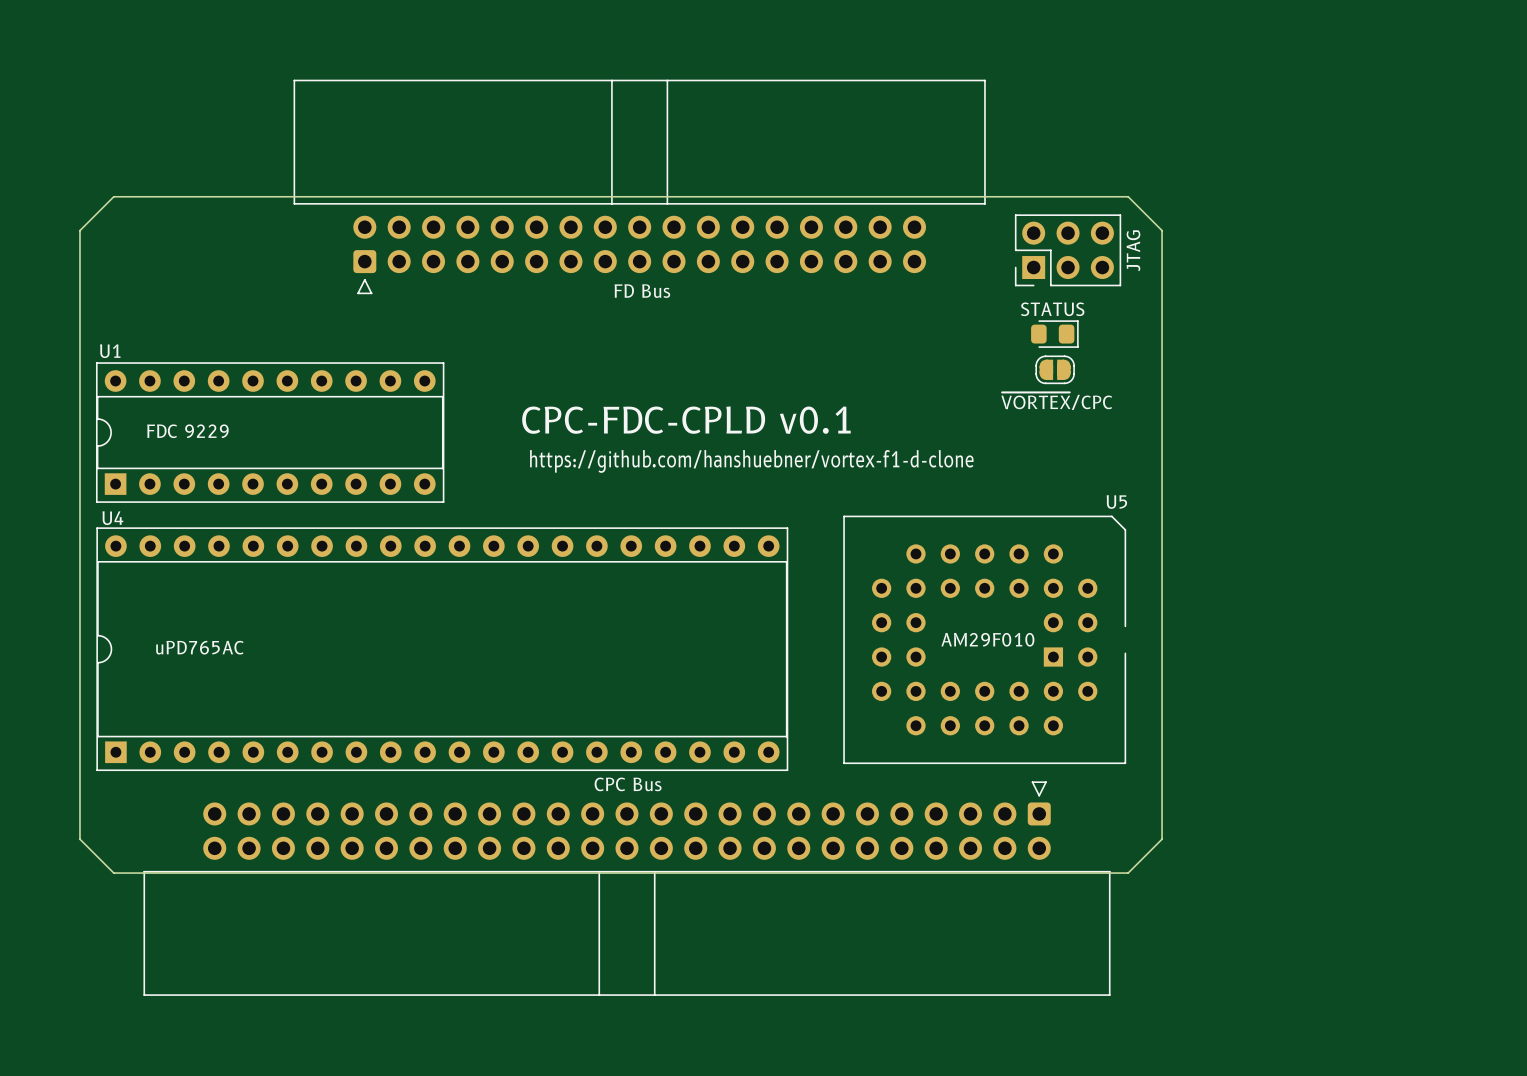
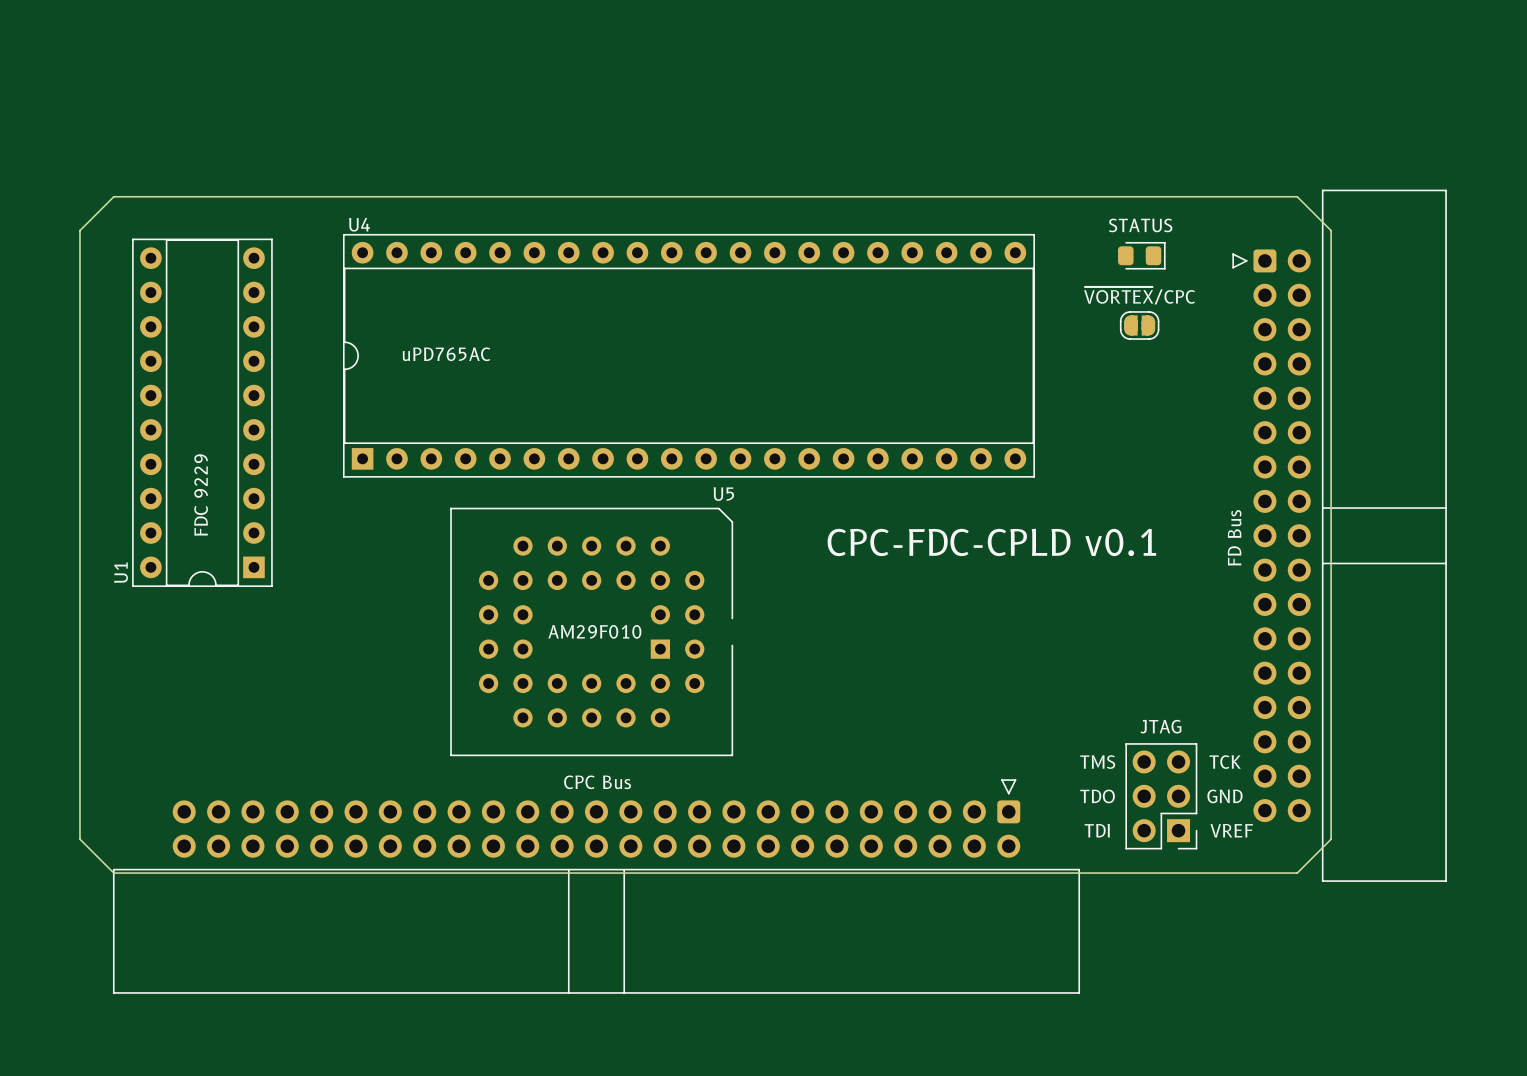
part: FD Bus (639, 186) -> none
board edge: (1128, 196) (1162, 230) (1162, 839) (1128, 873) -> (1128, 196) (1297, 196) (1331, 230) (1331, 839) (1297, 873) (1128, 873)
part: JTAG (1068, 250) -> none
part value position: STATUS (1052, 309) -> STATUS (1140, 225)
part position: (1054, 334) -> (1141, 255)
part position: (1055, 369) -> (1139, 325)
part value position: ~{VORTEX}/CPC (1056, 401) -> ~{VORTEX}/CPC (1139, 295)
text position: CPC-FDC-CPLD v0.1 (686, 420) -> CPC-FDC-CPLD v0.1 (991, 542)
U1 rotation: 0° (270, 432) -> 90° counterclockwise (202, 412)
text: https://github.com/hanshuebner/vortex-f1-d-clone (751, 461) -> none
part: none -> FD Bus (1339, 535)
U5 position: (984, 639) -> (591, 631)
U4 position: (442, 649) -> (688, 355)
text: none -> TMS (1097, 762)
text: none -> TCK (1225, 762)
text: none -> TDO (1097, 796)
part: none -> JTAG (1161, 796)
text: none -> GND (1224, 796)
text: none -> TDI (1097, 830)
text: none -> VREF (1231, 830)
part position: (627, 888) -> (596, 886)

